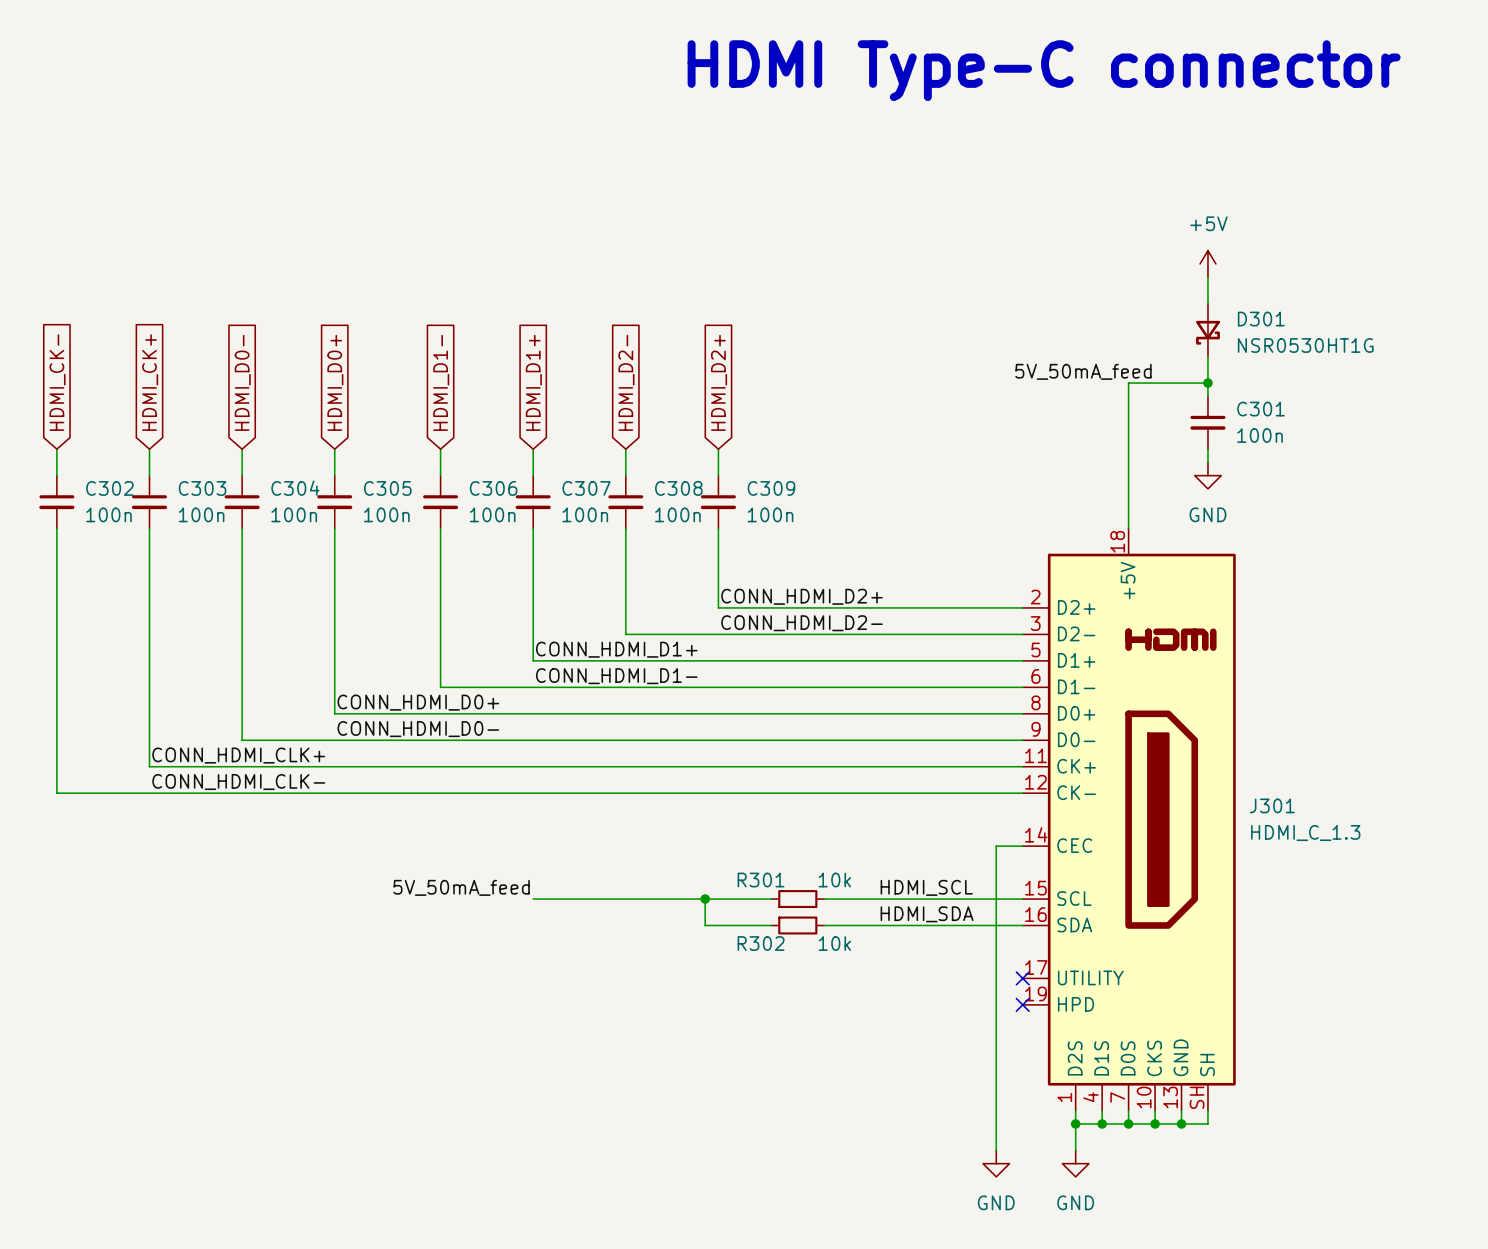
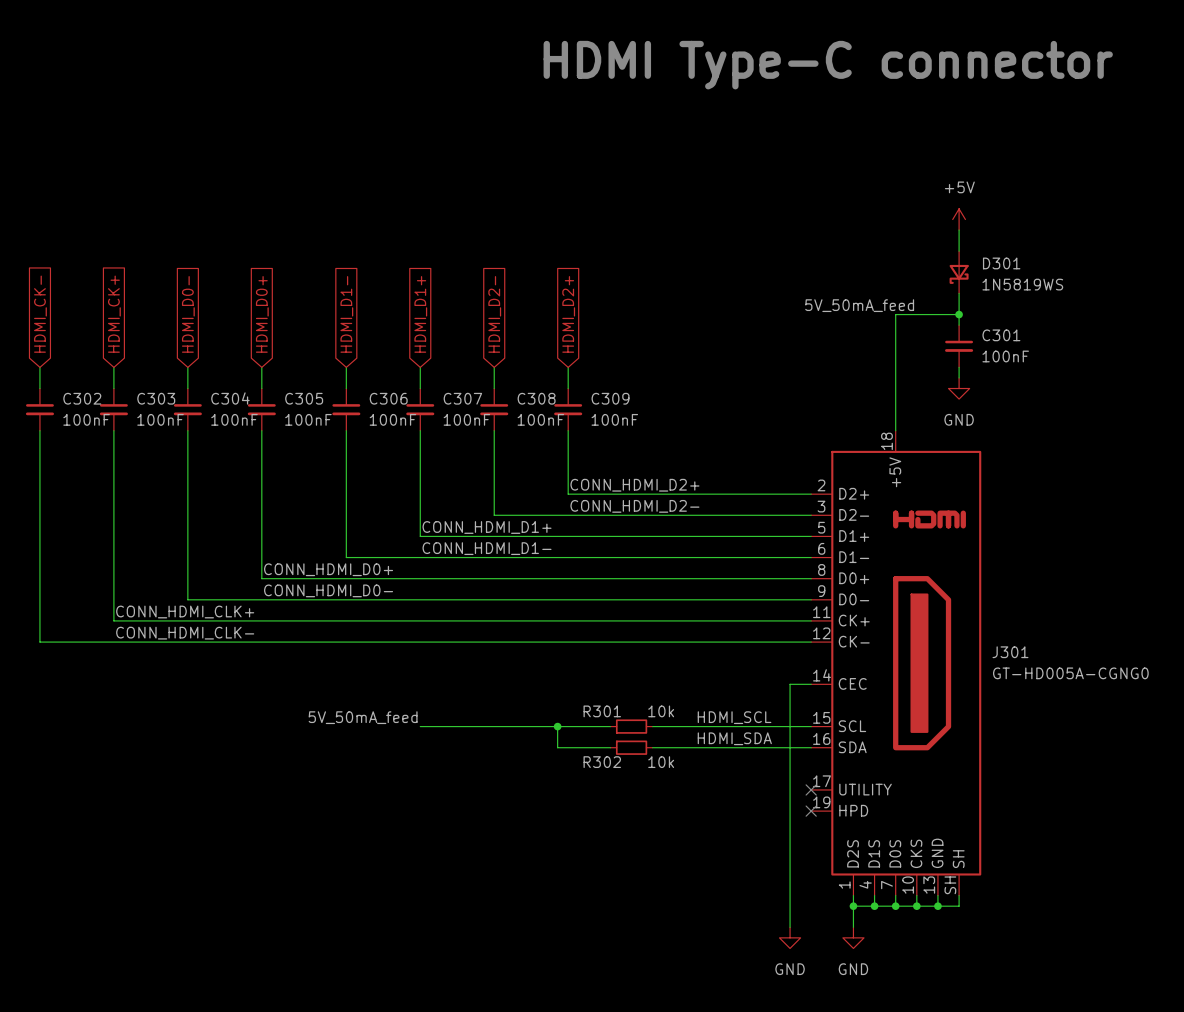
D301 value: NSR0530HT1G (1305, 345) -> 1N5819WS (1022, 284)
C301 value: 100n (1260, 435) -> 100nF (1005, 356)
C302 value: 100n (108, 514) -> 100nF (86, 419)
C303 value: 100n (201, 514) -> 100nF (160, 419)
C304 value: 100n (294, 514) -> 100nF (234, 419)
C305 value: 100n (386, 514) -> 100nF (308, 419)
C306 value: 100n (492, 514) -> 100nF (392, 419)
C307 value: 100n (585, 514) -> 100nF (466, 419)
C308 value: 100n (677, 514) -> 100nF (540, 419)
C309 value: 100n (770, 514) -> 100nF (614, 419)
J301 value: HDMI_C_1.3 (1305, 833) -> GT-HD005A-CGNG0 (1070, 673)

